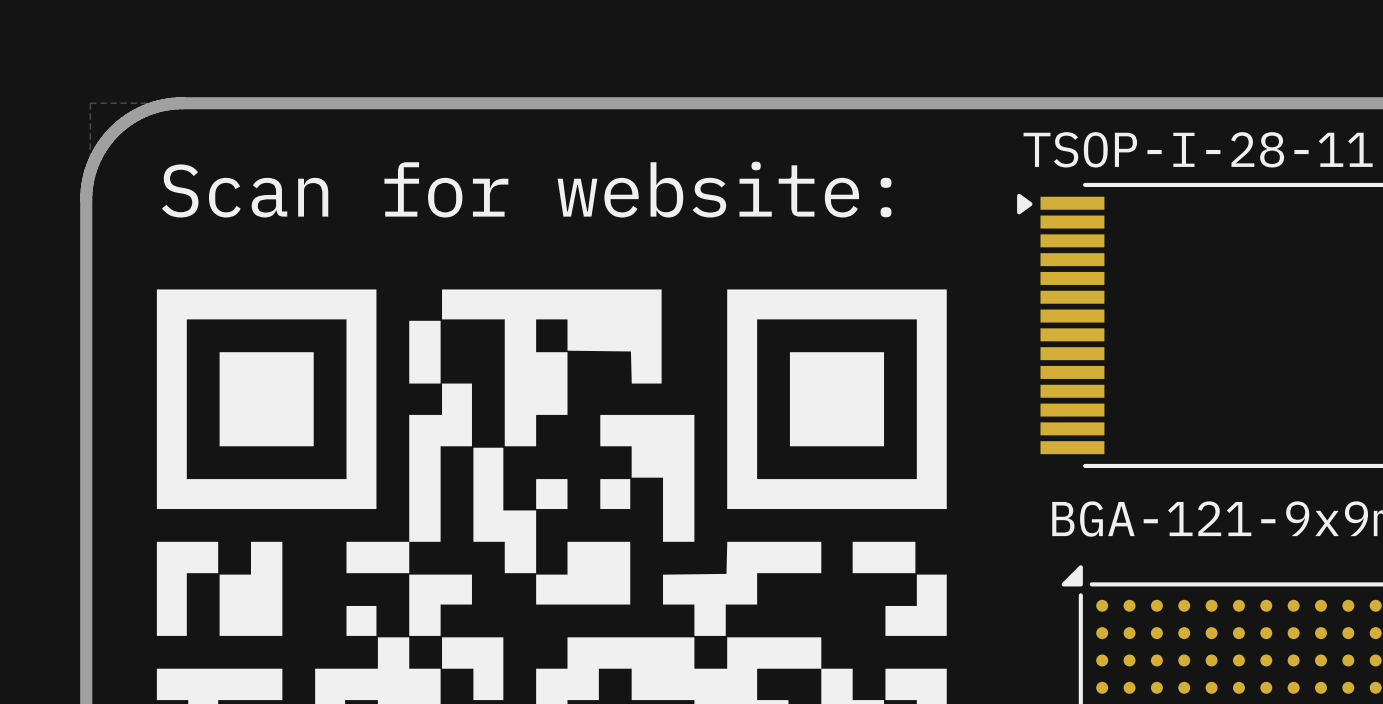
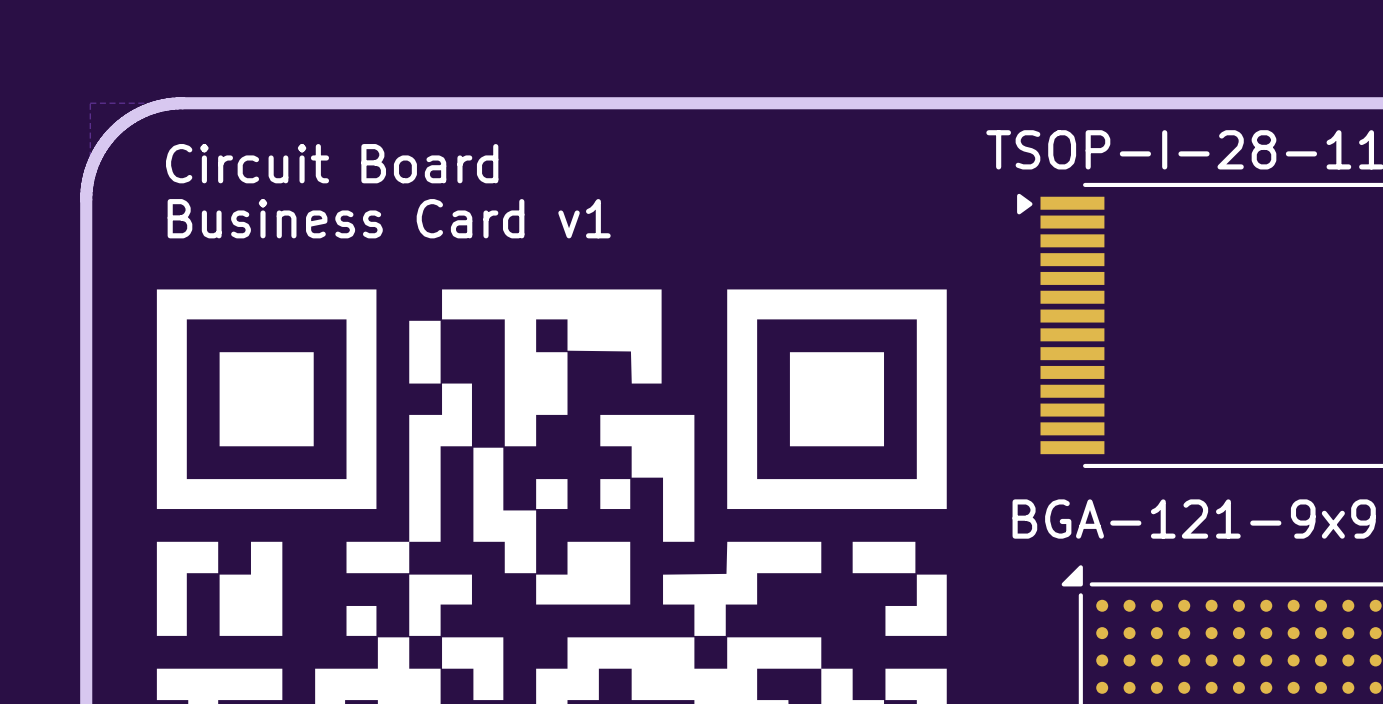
text: none -> Circuit Board (332, 163)
text: Scan for website: (526, 189) -> Business Card v1 (389, 218)

